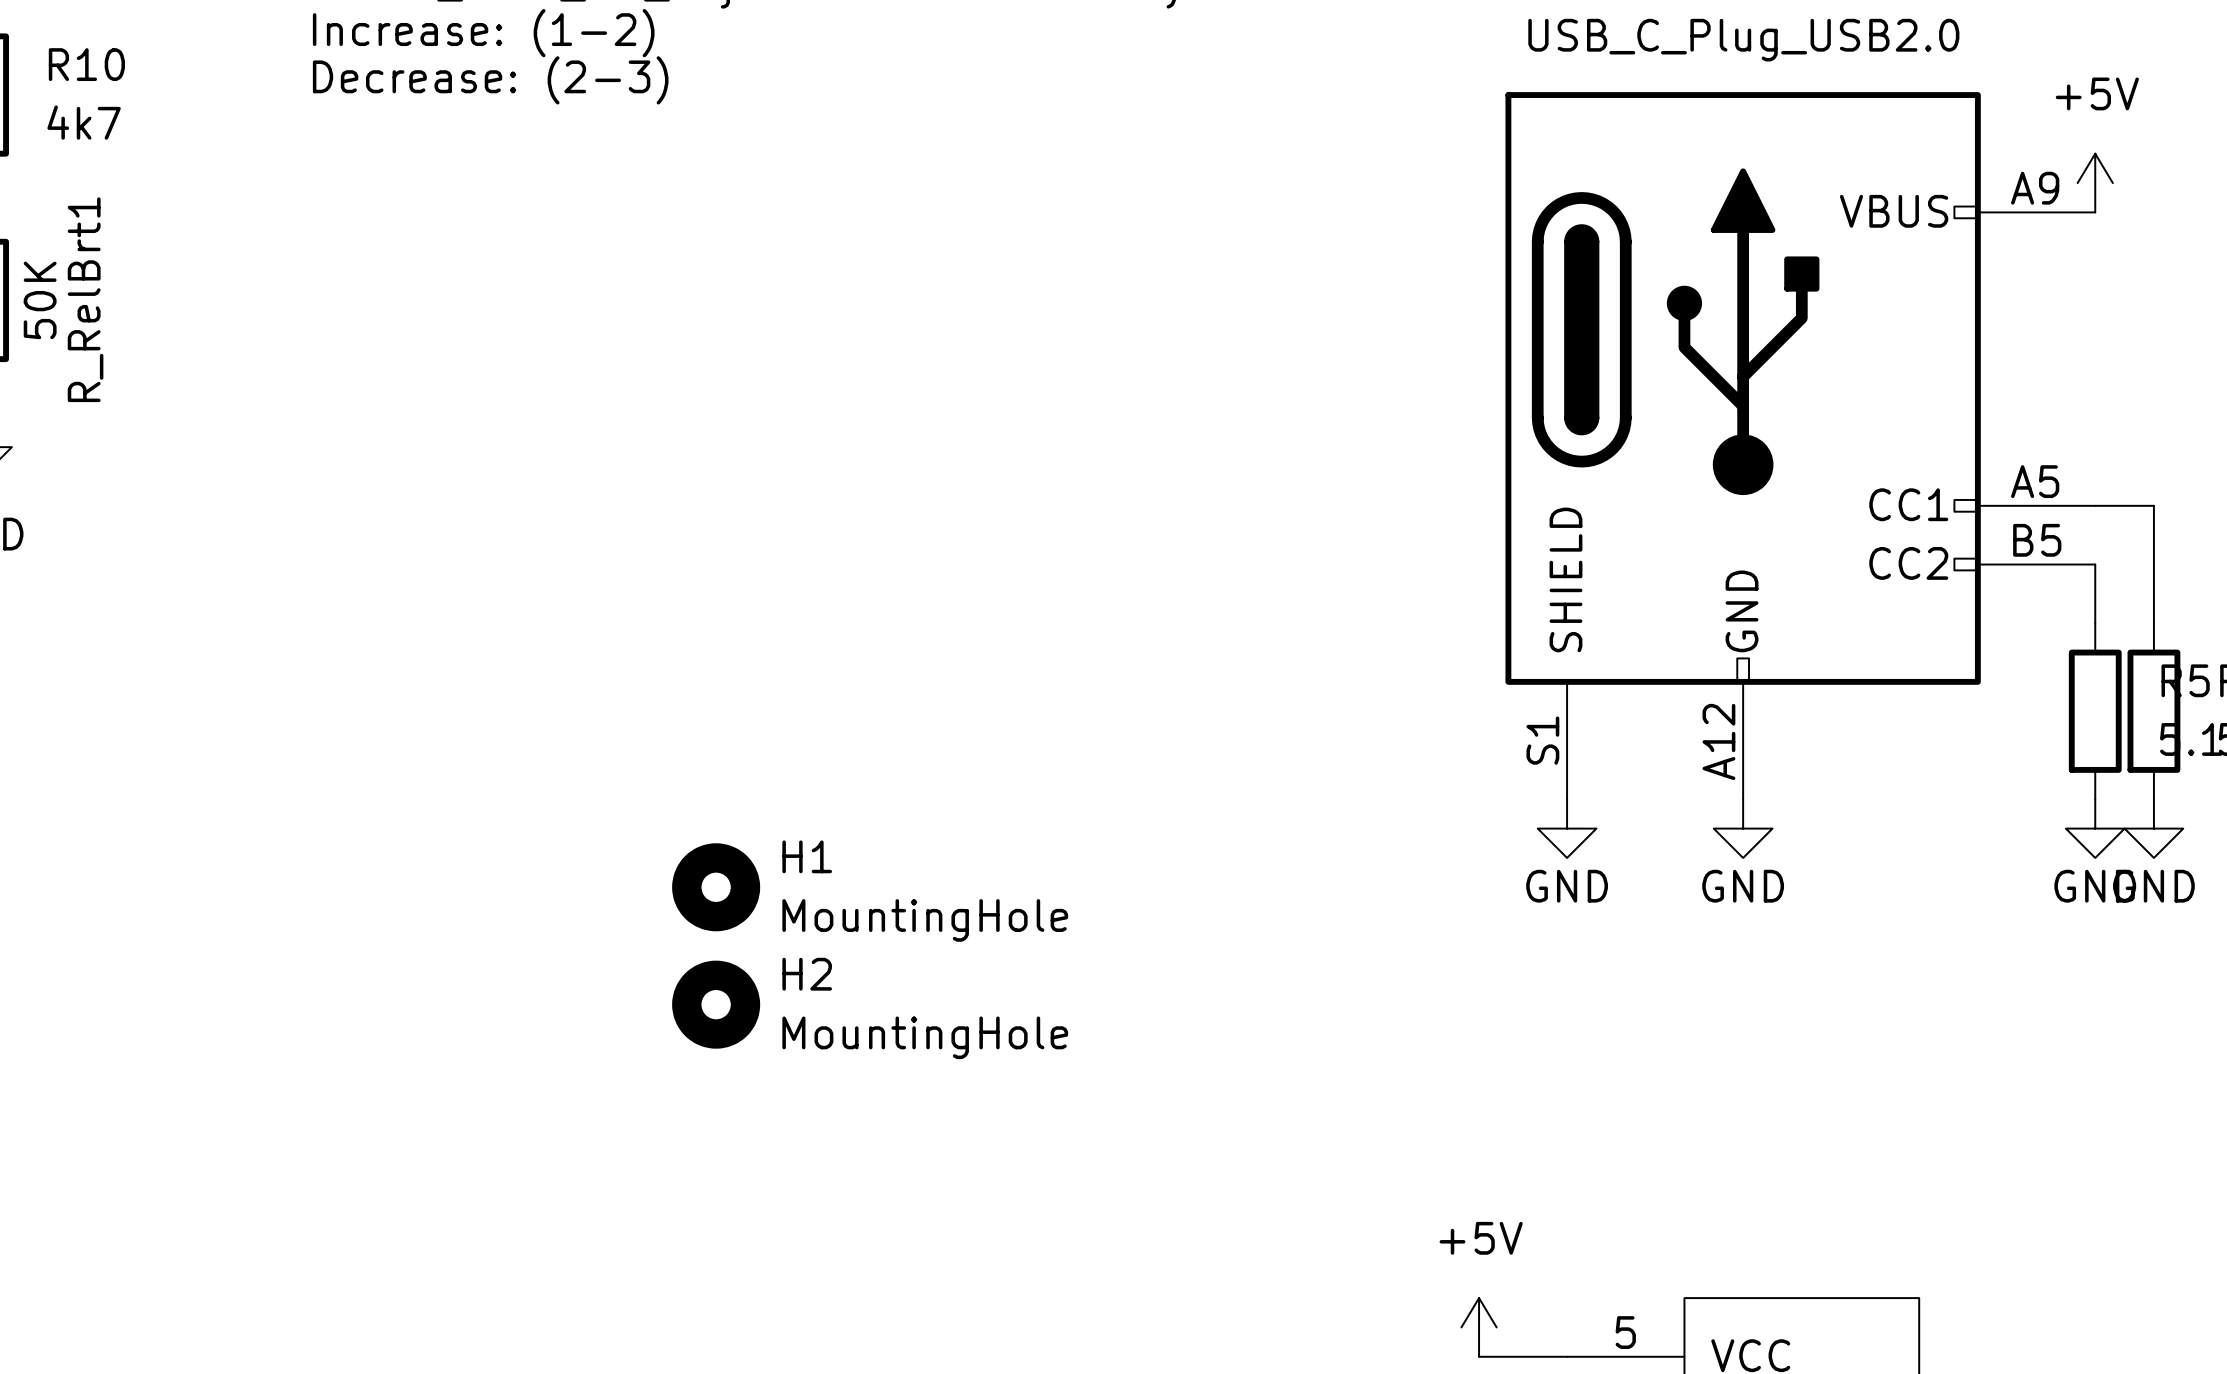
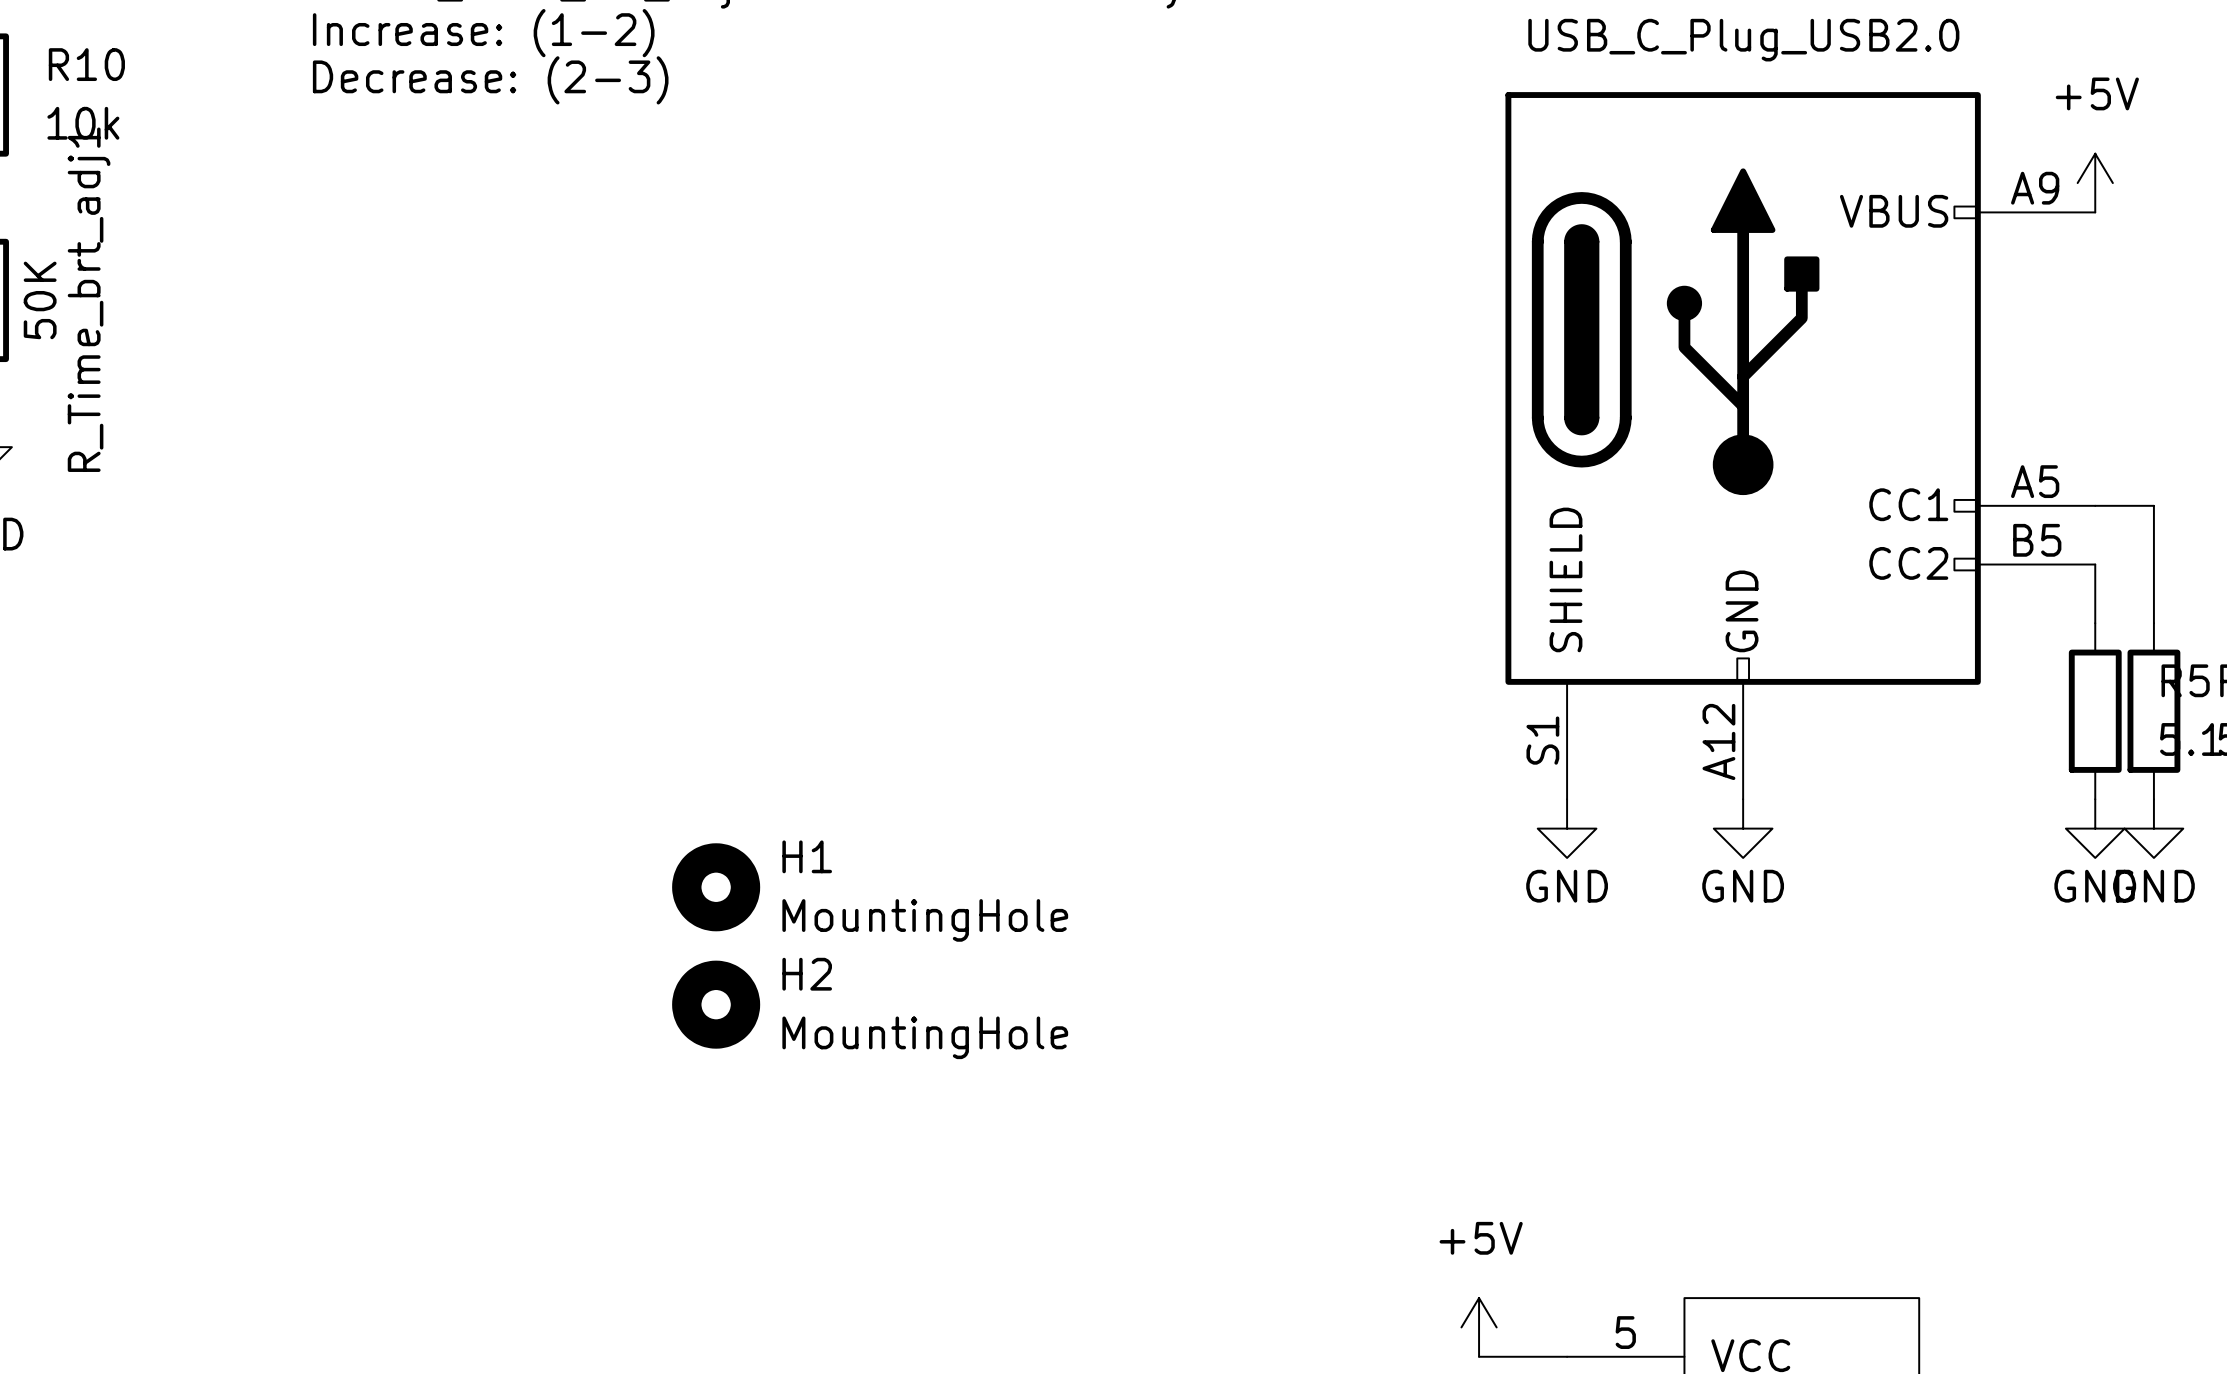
R10 value: 4k7 (84, 122) -> 10k (83, 123)
R_RelBrt1 name: R_RelBrt1 (85, 299) -> R_Time_brt_adj1 (89, 299)

